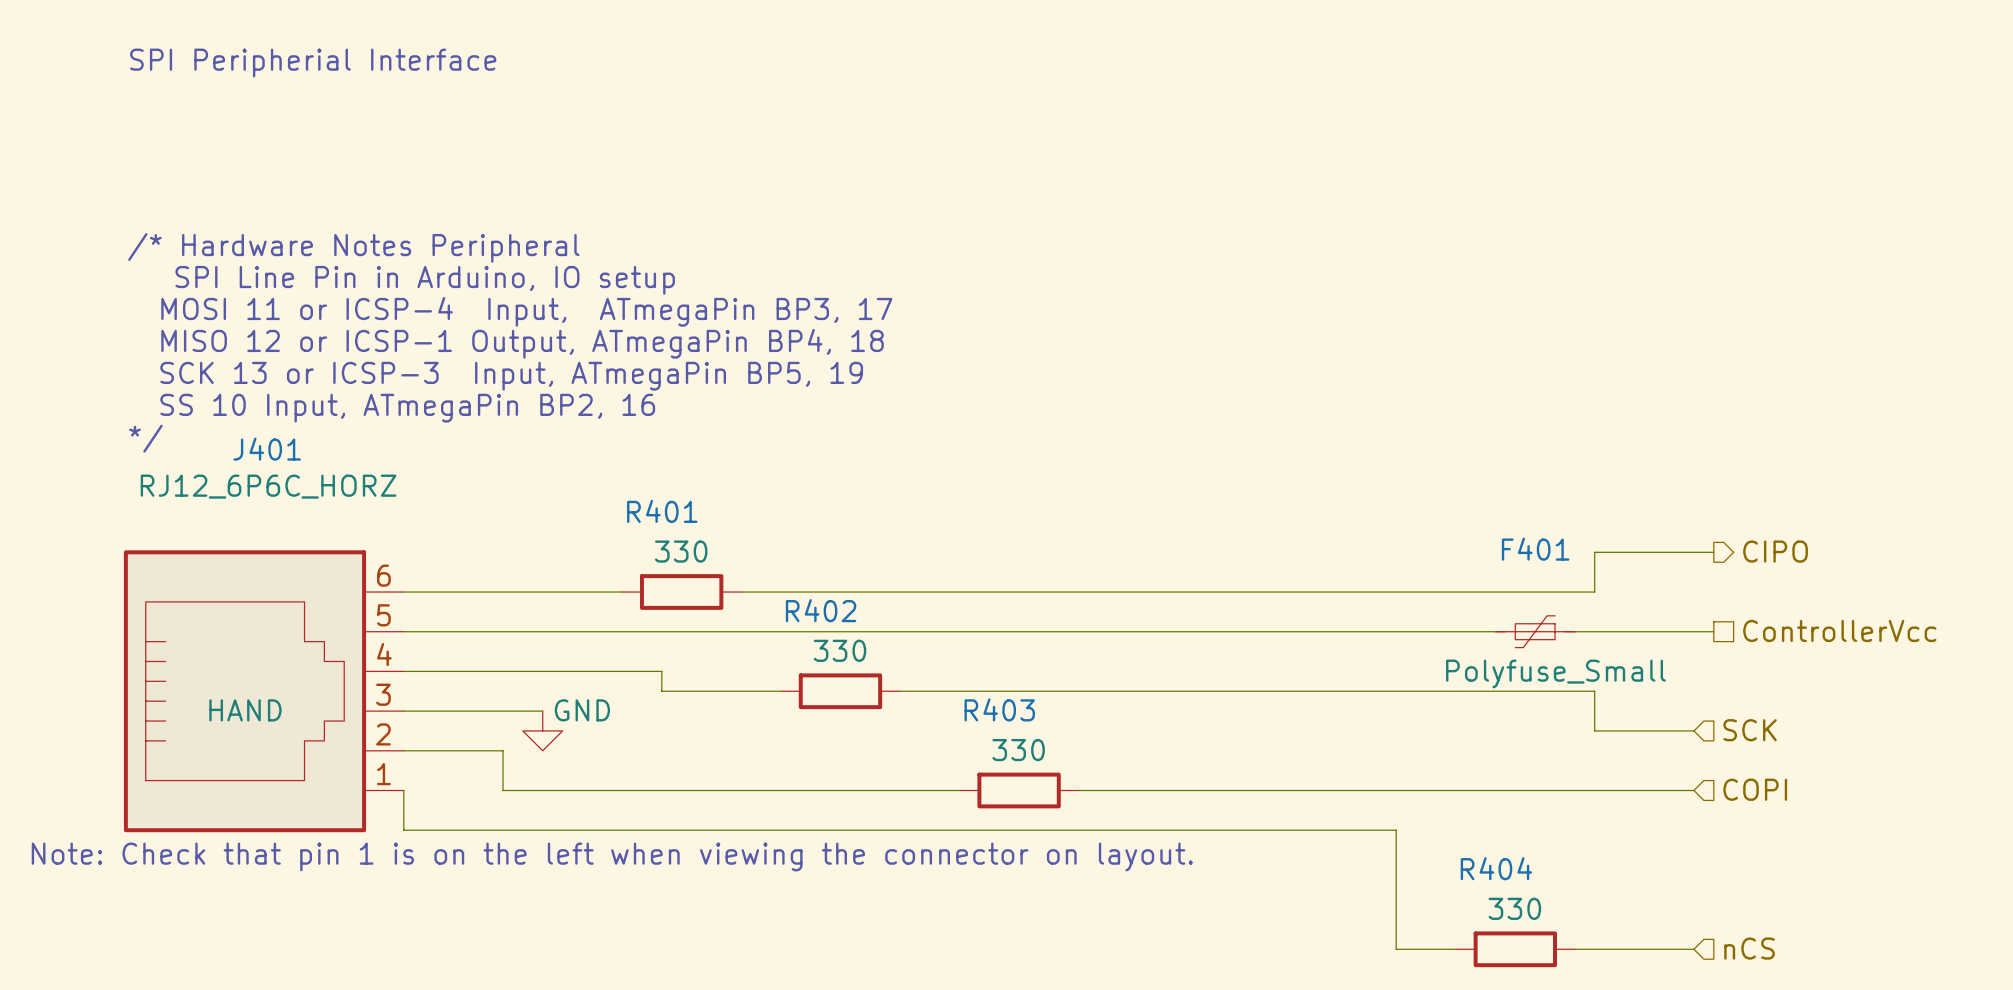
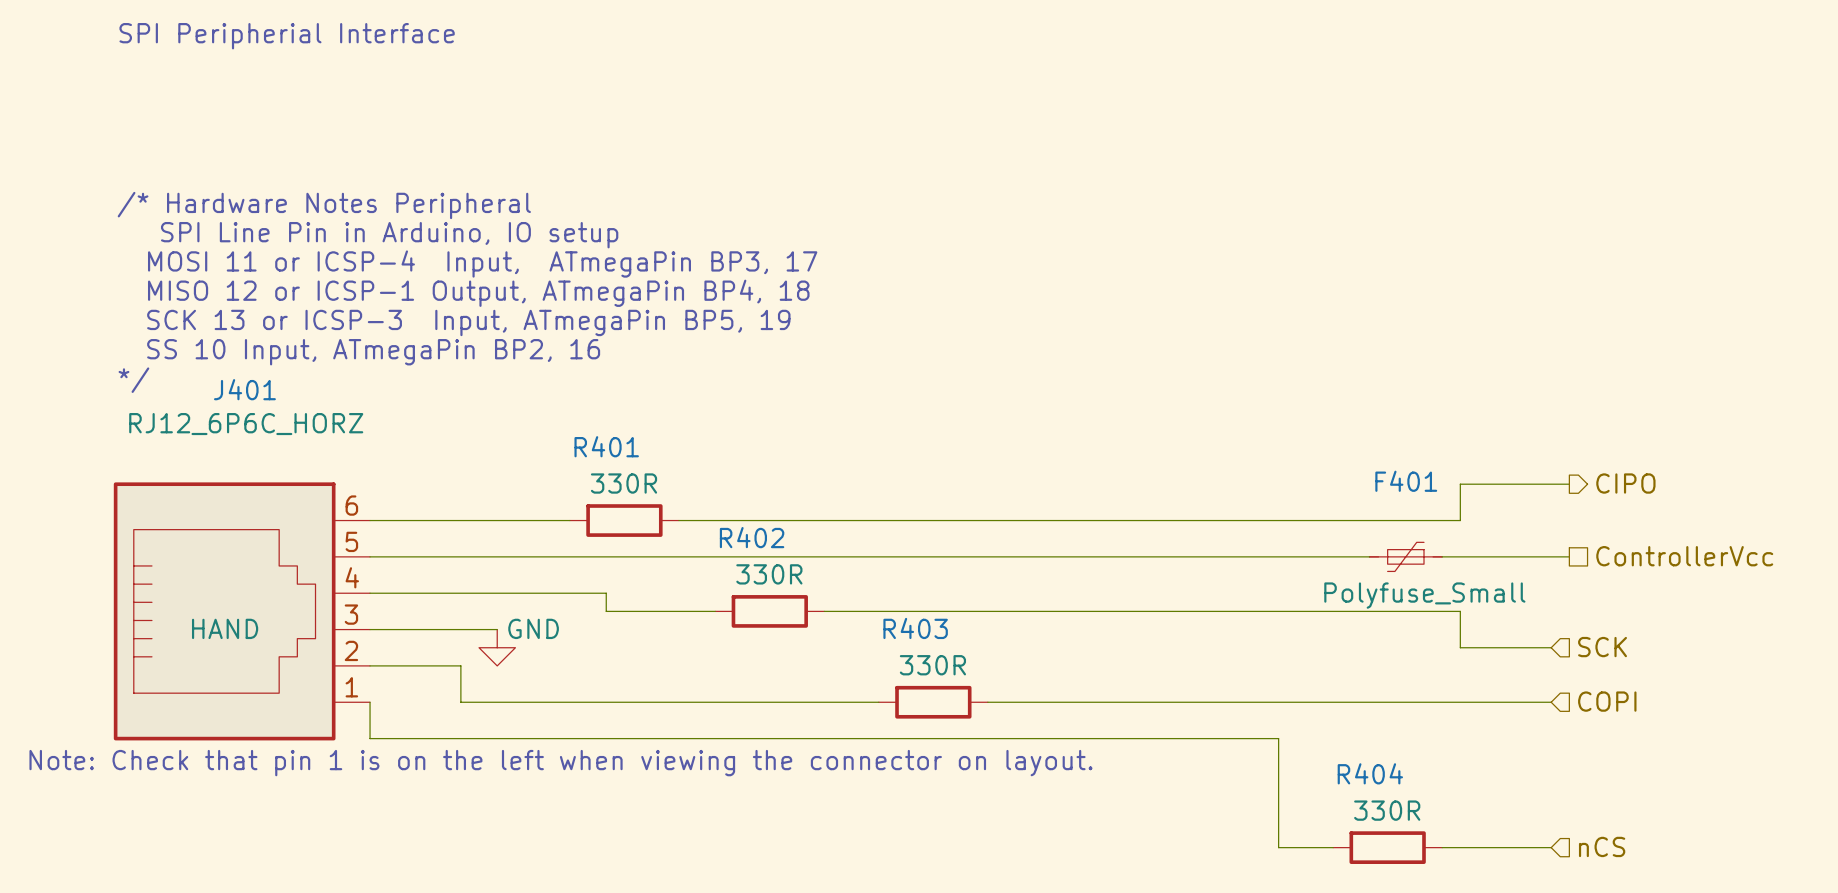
R401 value: 330 (681, 551) -> 330R (624, 483)
R402 value: 330 (839, 650) -> 330R (769, 574)
R403 value: 330 (1018, 750) -> 330R (932, 665)
R404 value: 330 (1514, 908) -> 330R (1387, 810)

